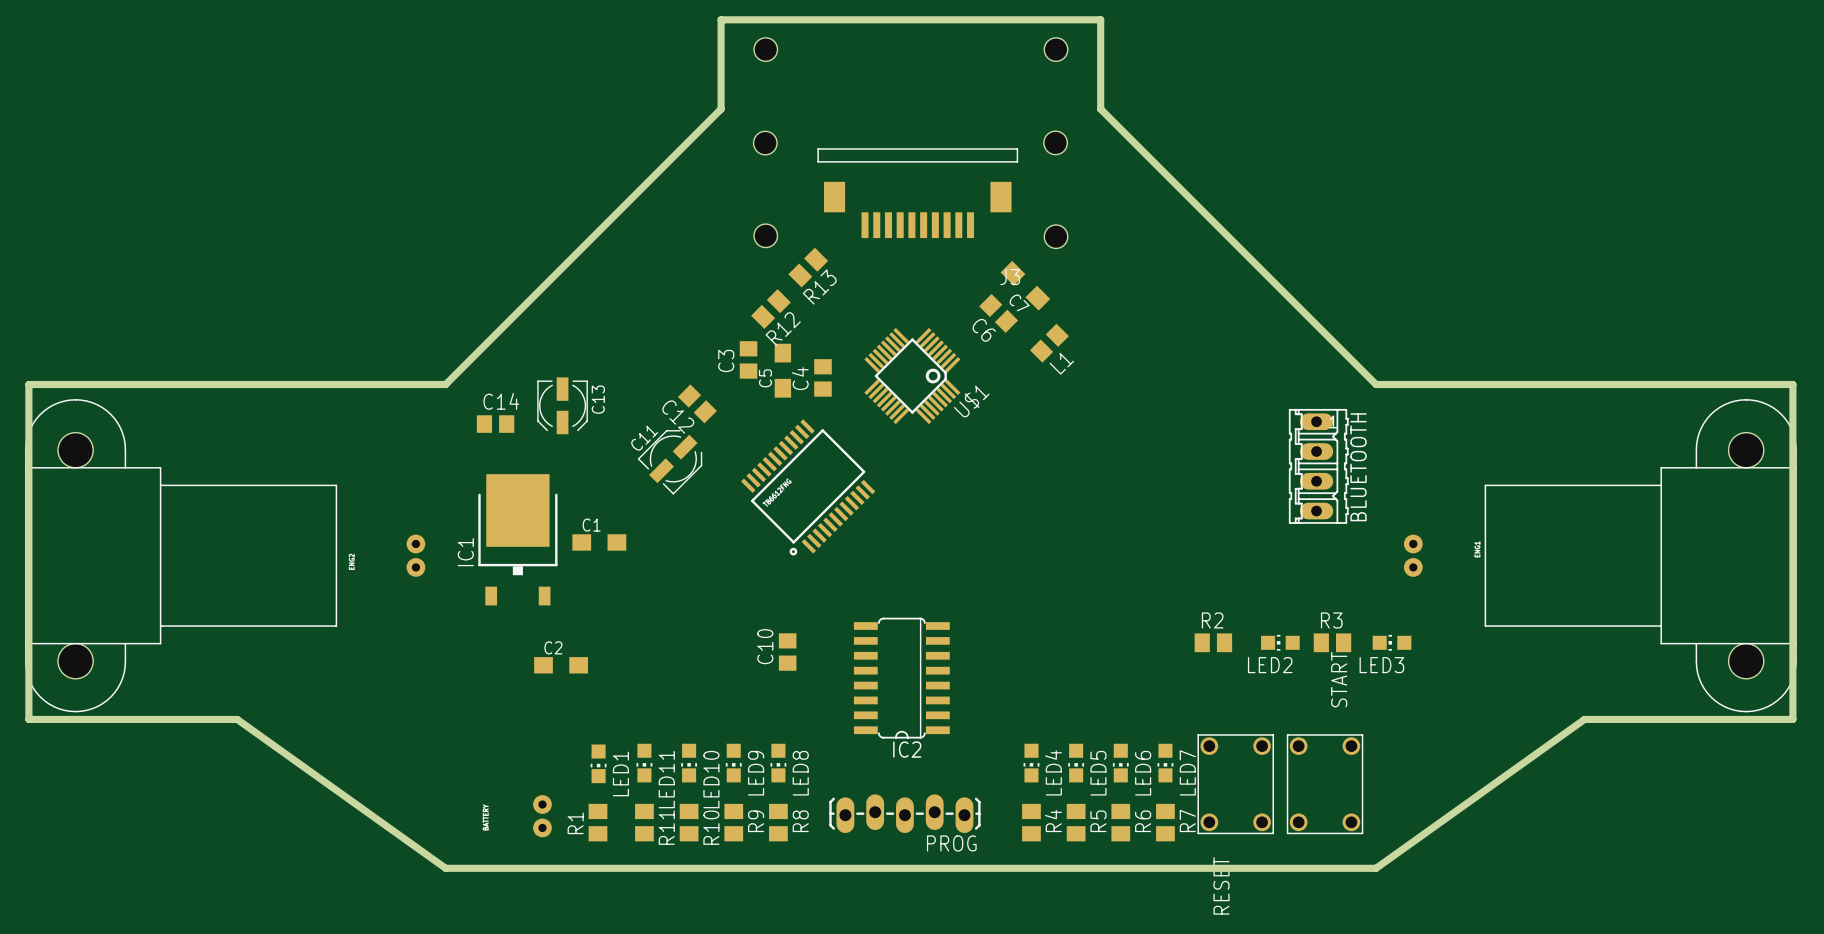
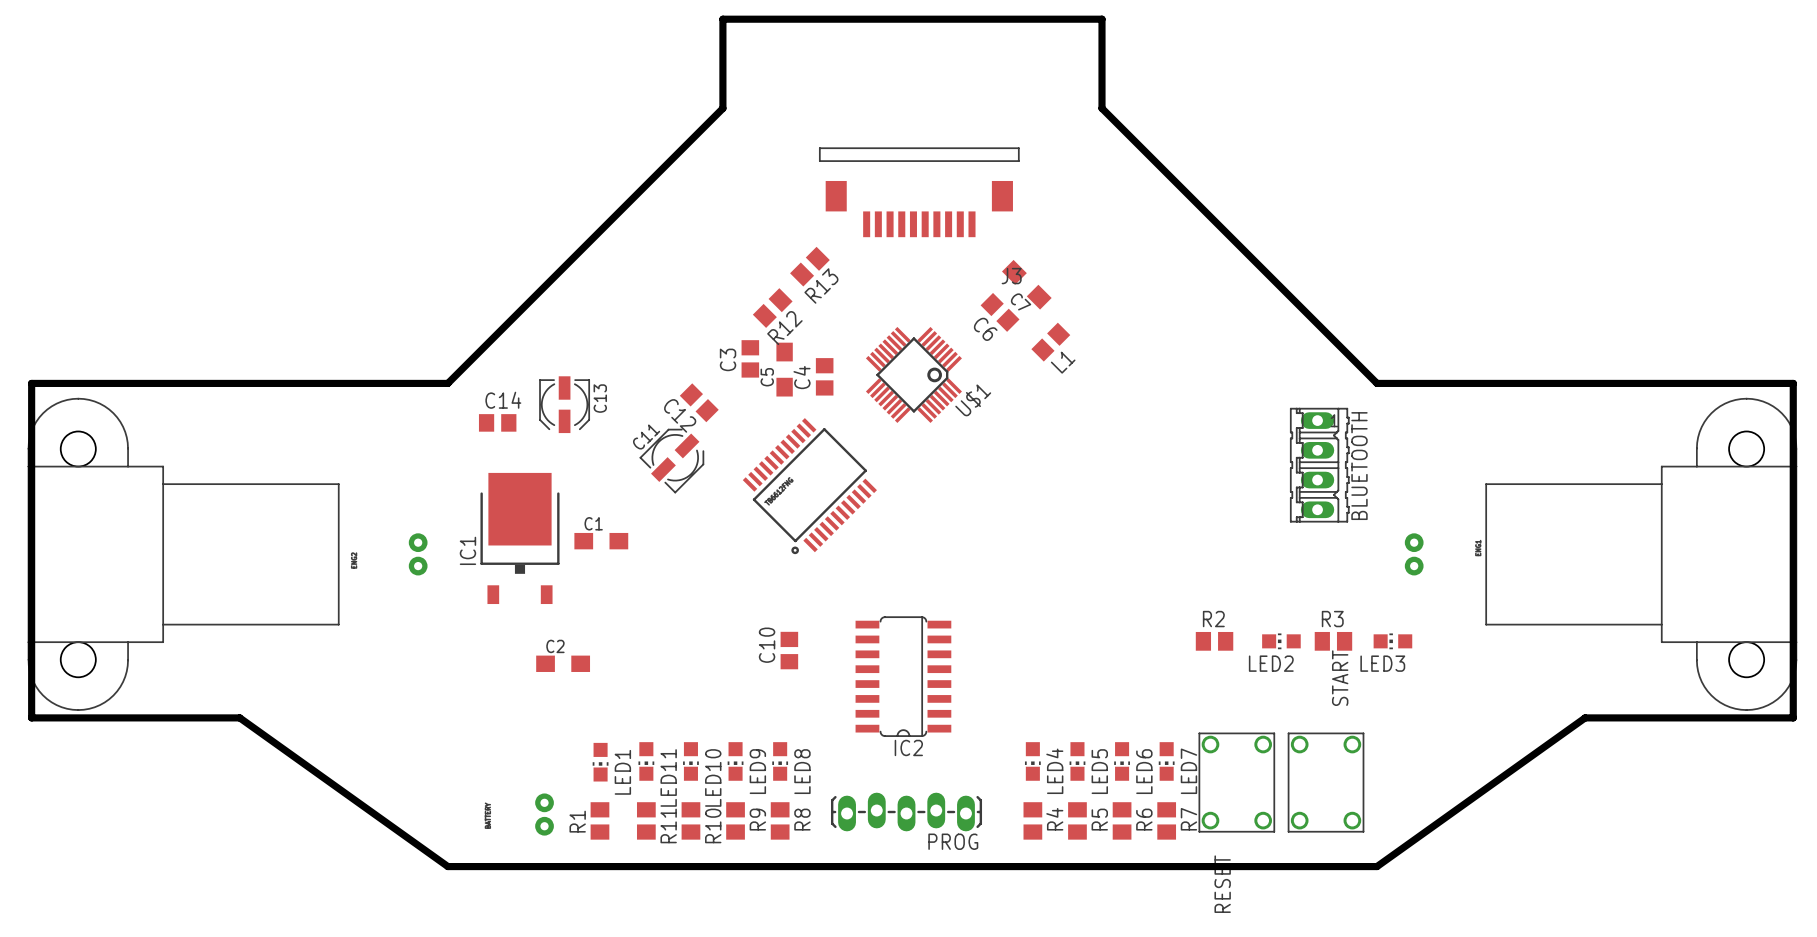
hole: (765, 49) -> none
hole: (1056, 49) -> none
hole: (1055, 142) -> none
hole: (765, 143) -> none
hole: (765, 235) -> none
hole: (1056, 236) -> none

